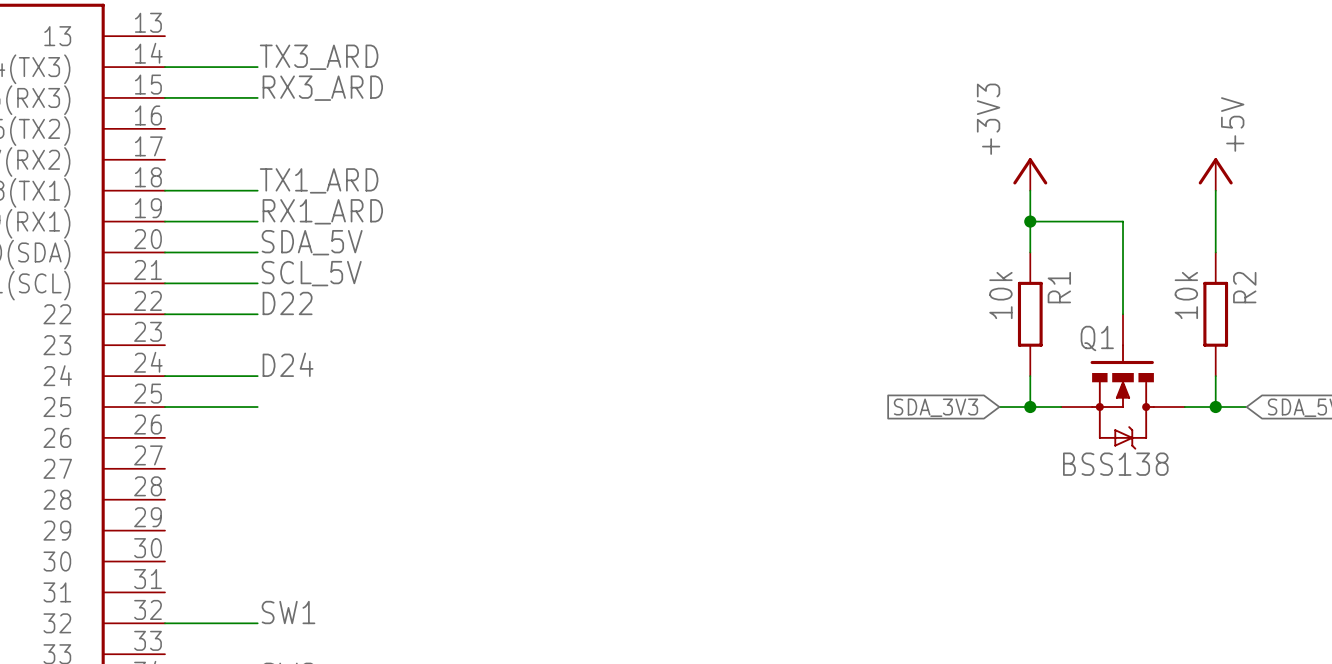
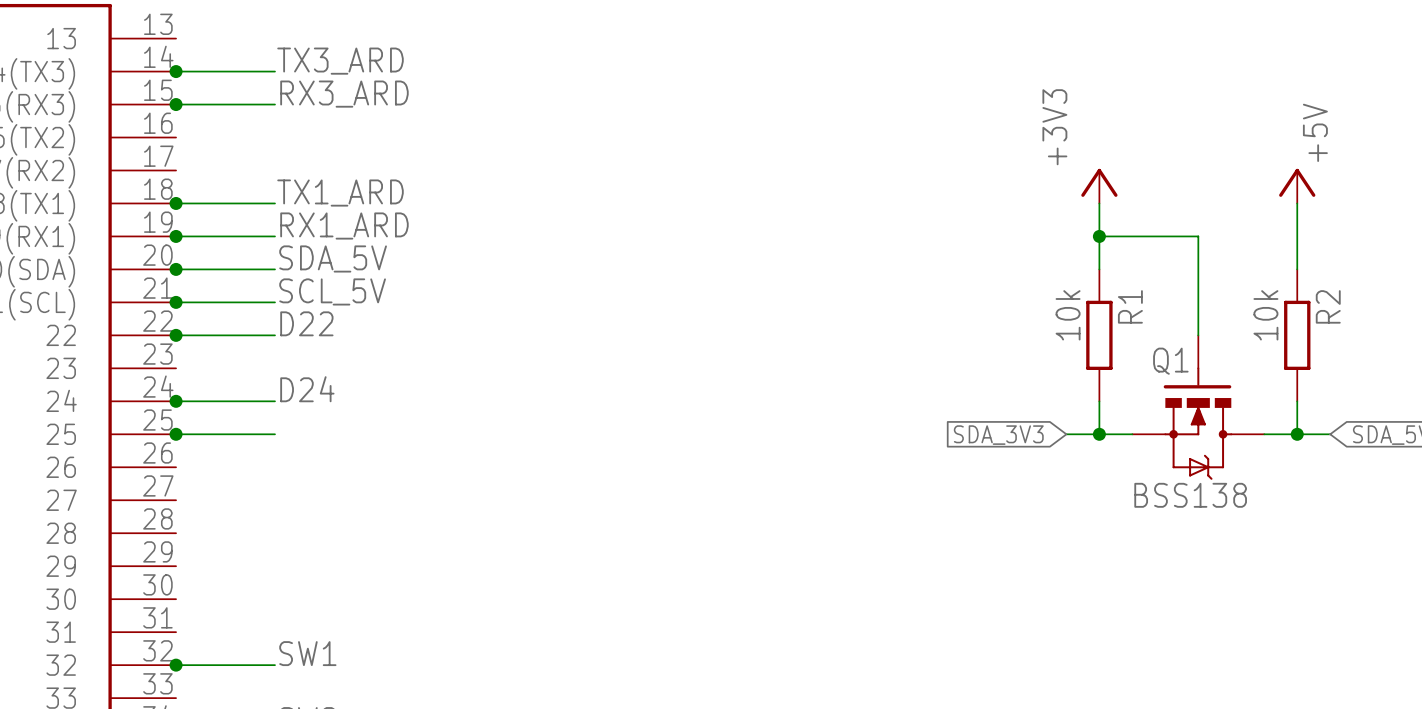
junction: none -> (176, 71)
junction: none -> (176, 104)
junction: none -> (176, 203)
junction: none -> (176, 236)
junction: none -> (176, 269)
junction: none -> (176, 302)
junction: none -> (176, 335)
junction: none -> (176, 401)
junction: none -> (176, 434)
junction: none -> (176, 665)

